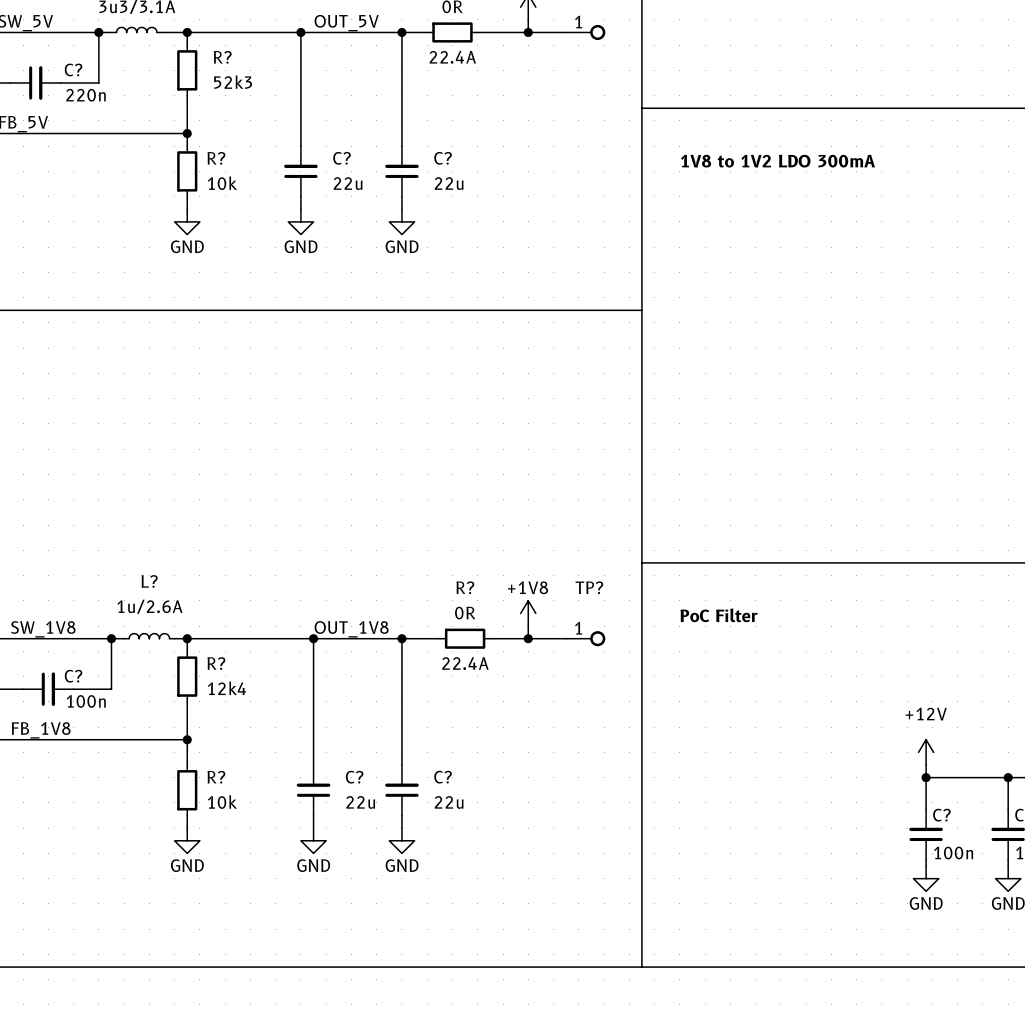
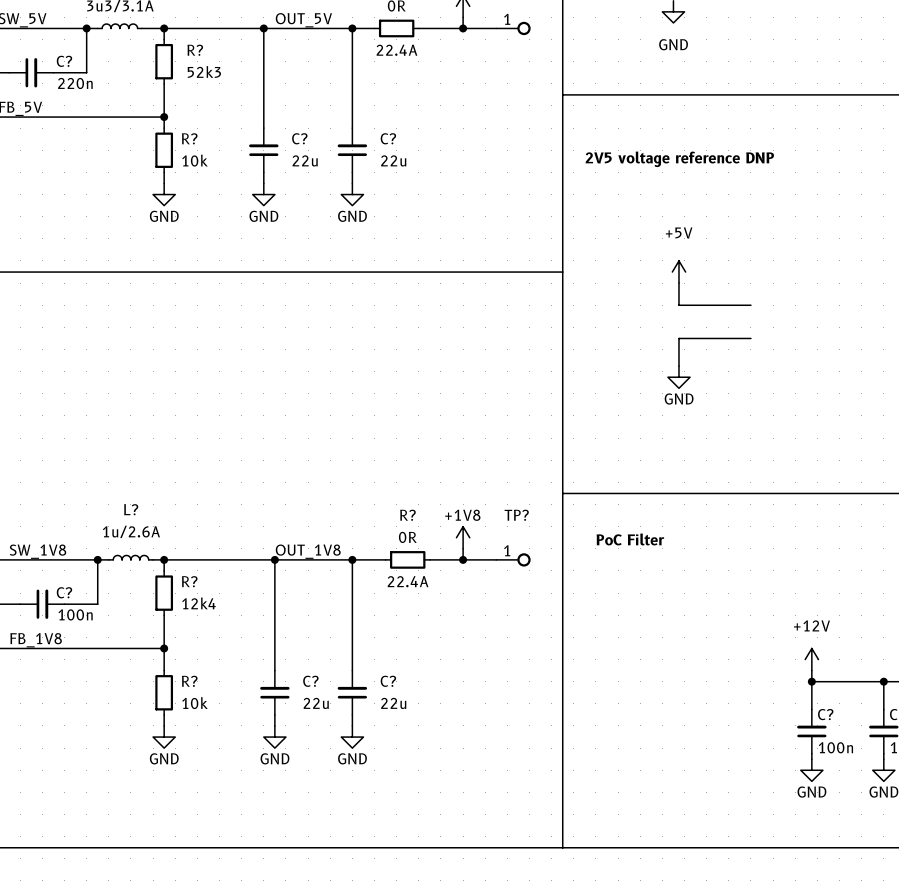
power symbol: none -> GND (673, 11)
text: 1V8 to 1V2 LDO 300mA (777, 161) -> none
text: none -> 2V5 voltage reference DNP (679, 159)
power symbol: none -> +5V (678, 272)
wire: none -> (678, 283) (678, 305) (750, 305)
wire: none -> (750, 338) (678, 338) (678, 366)
power symbol: none -> GND (678, 377)

